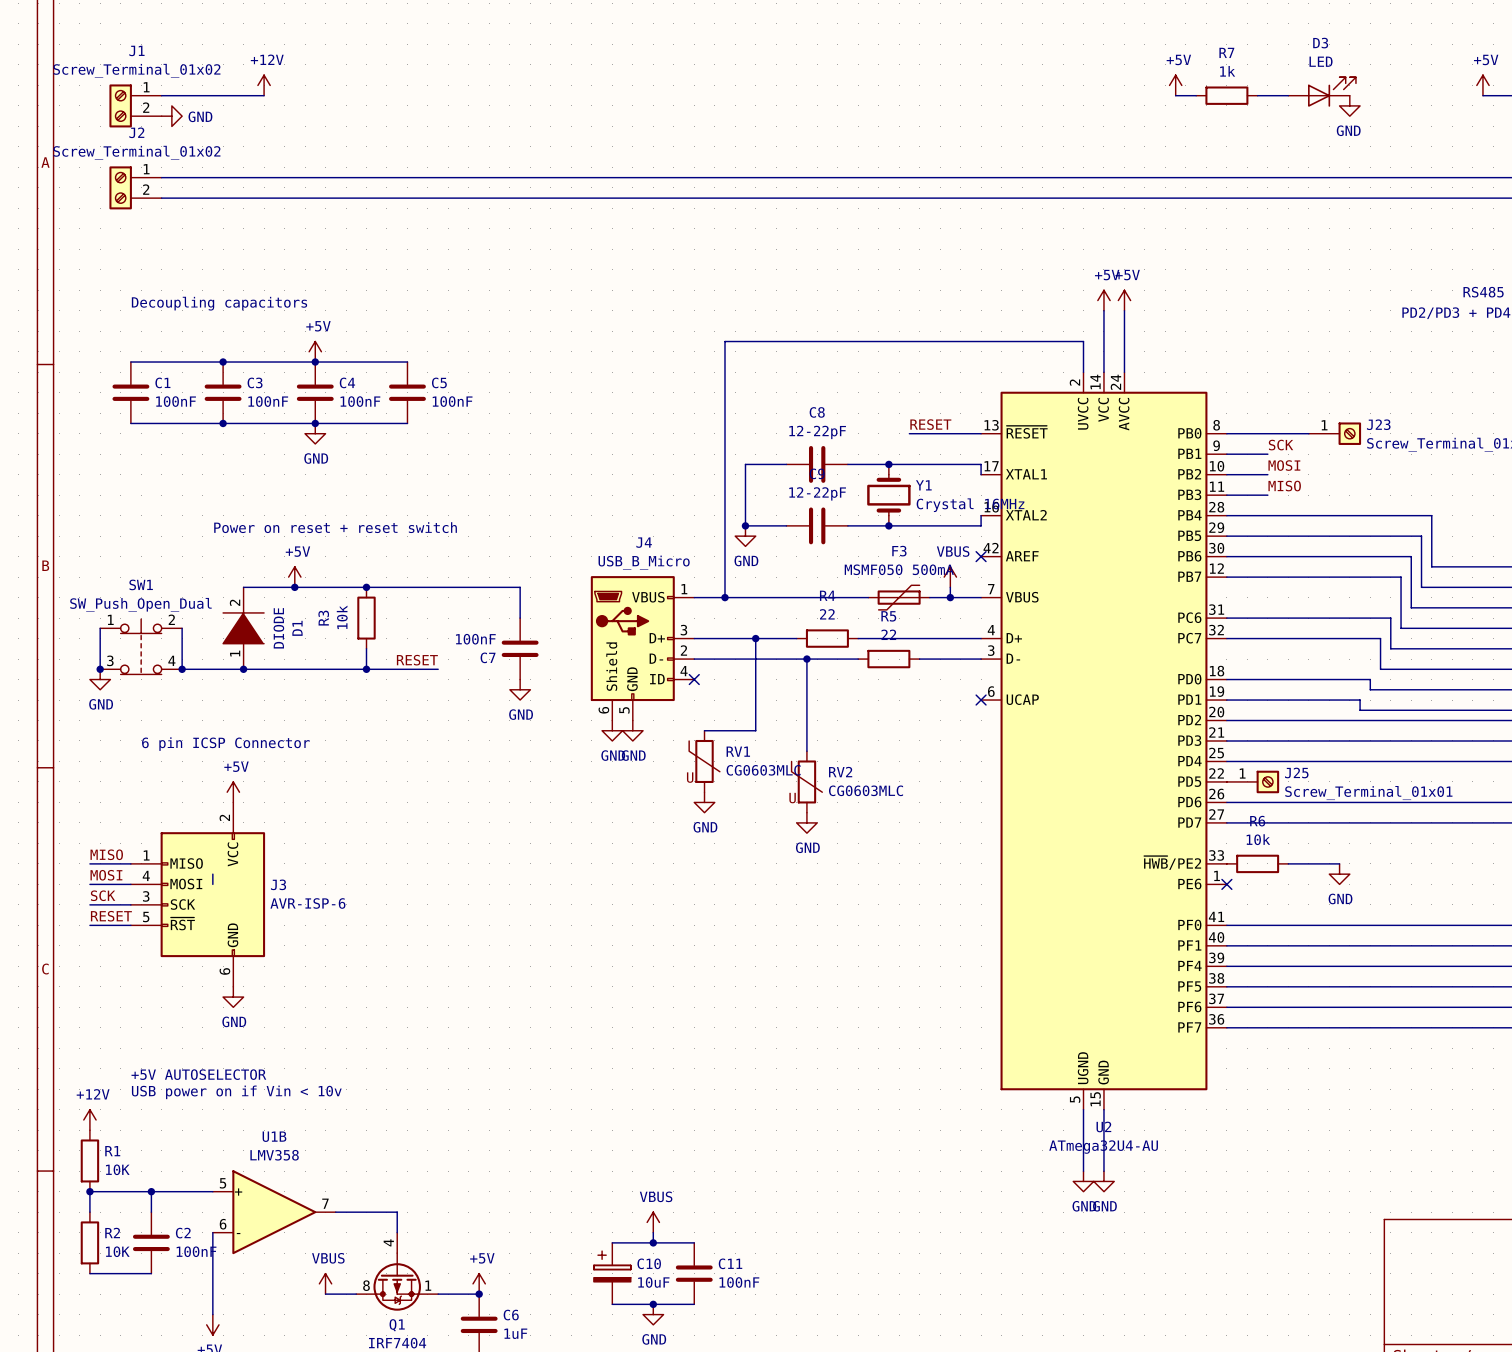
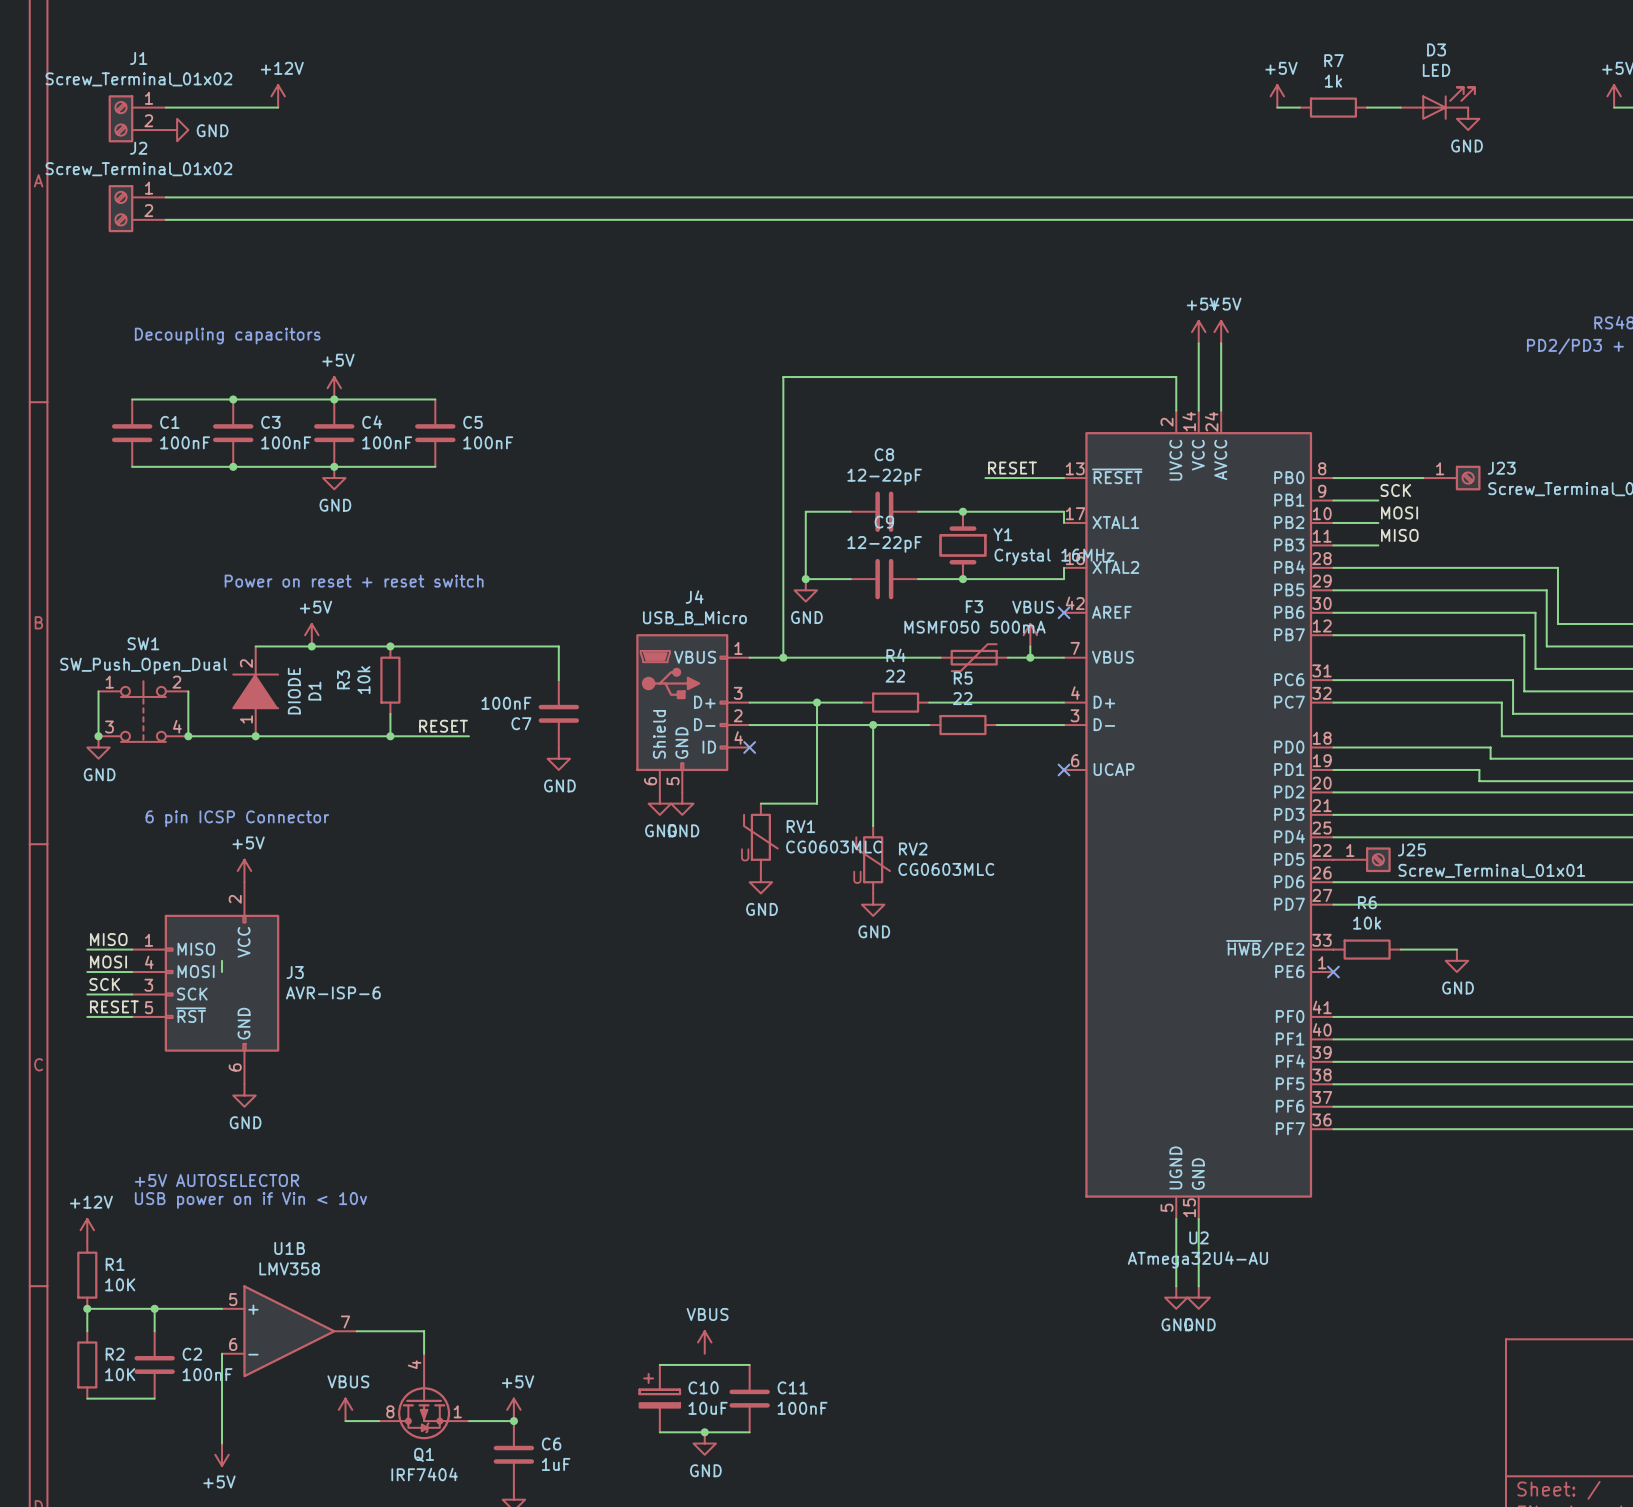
wire: (653, 1232) (653, 1242) -> none
junction: (653, 1242) -> none

